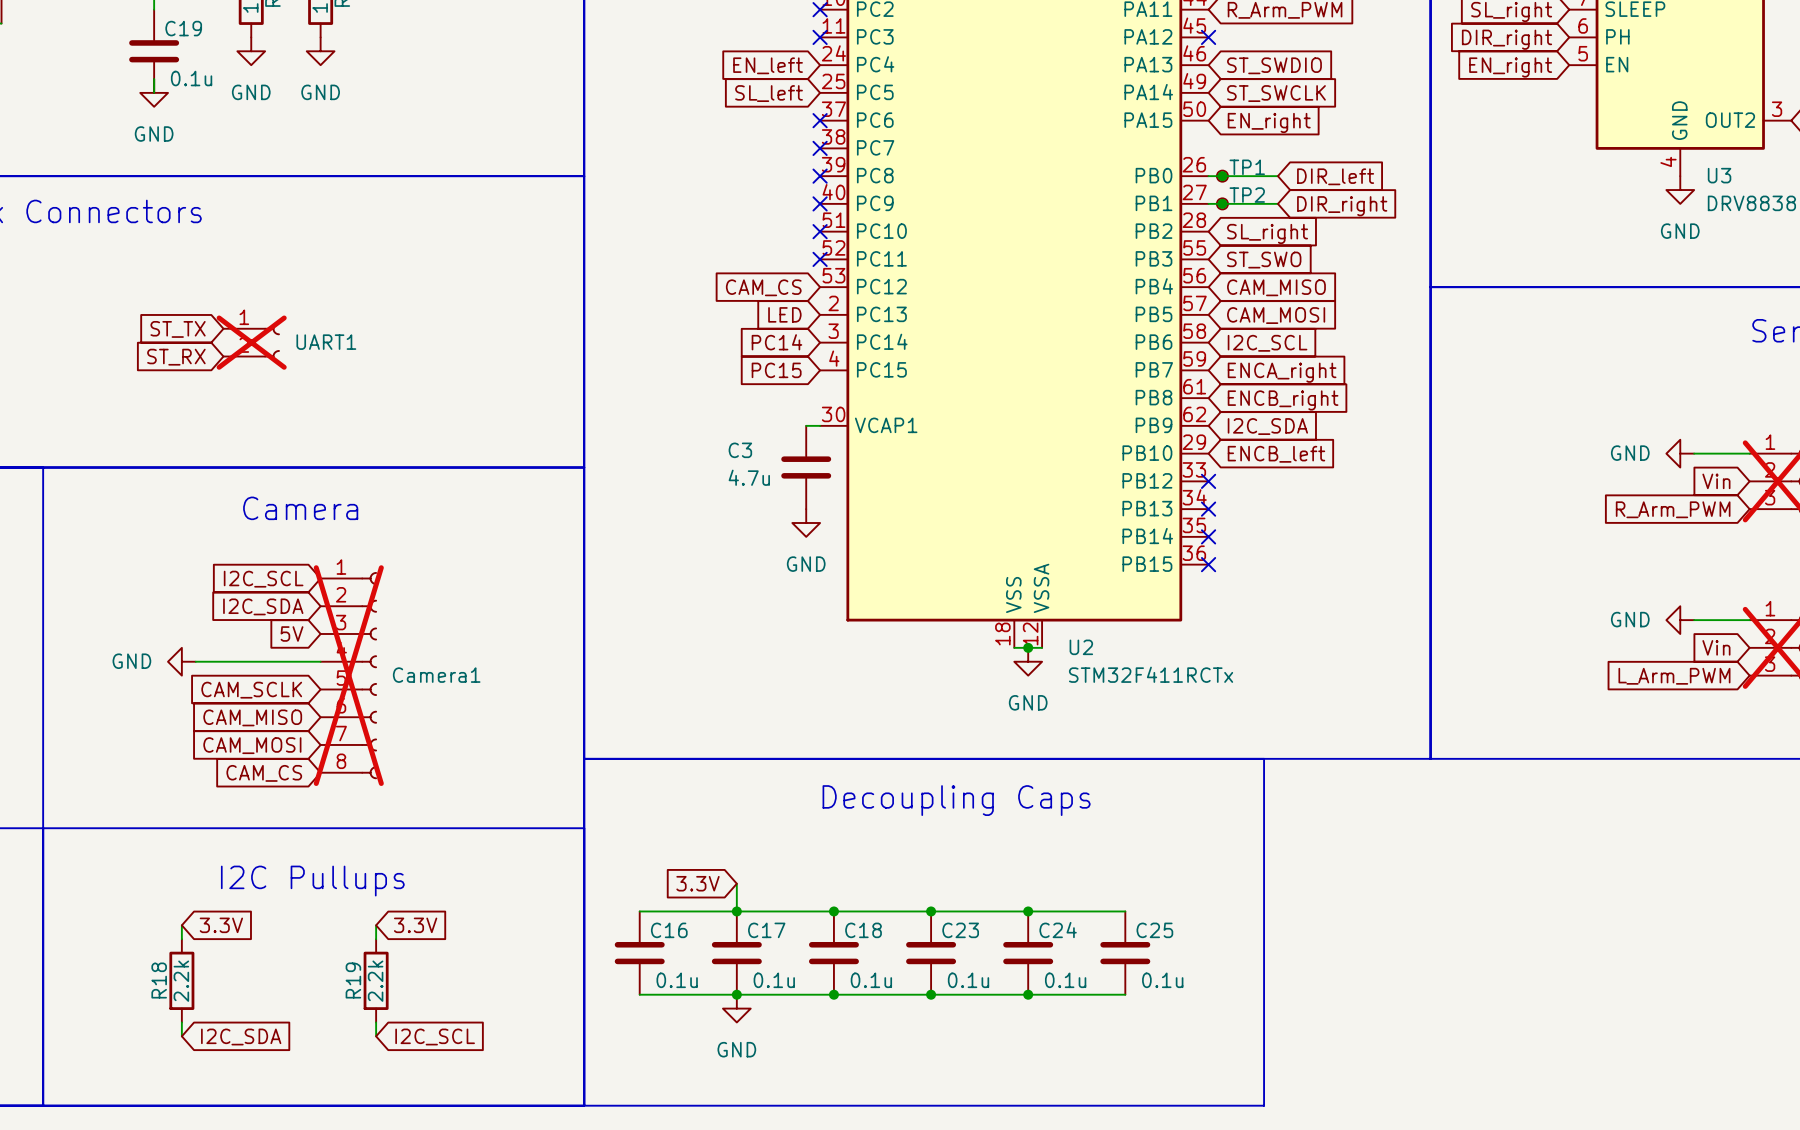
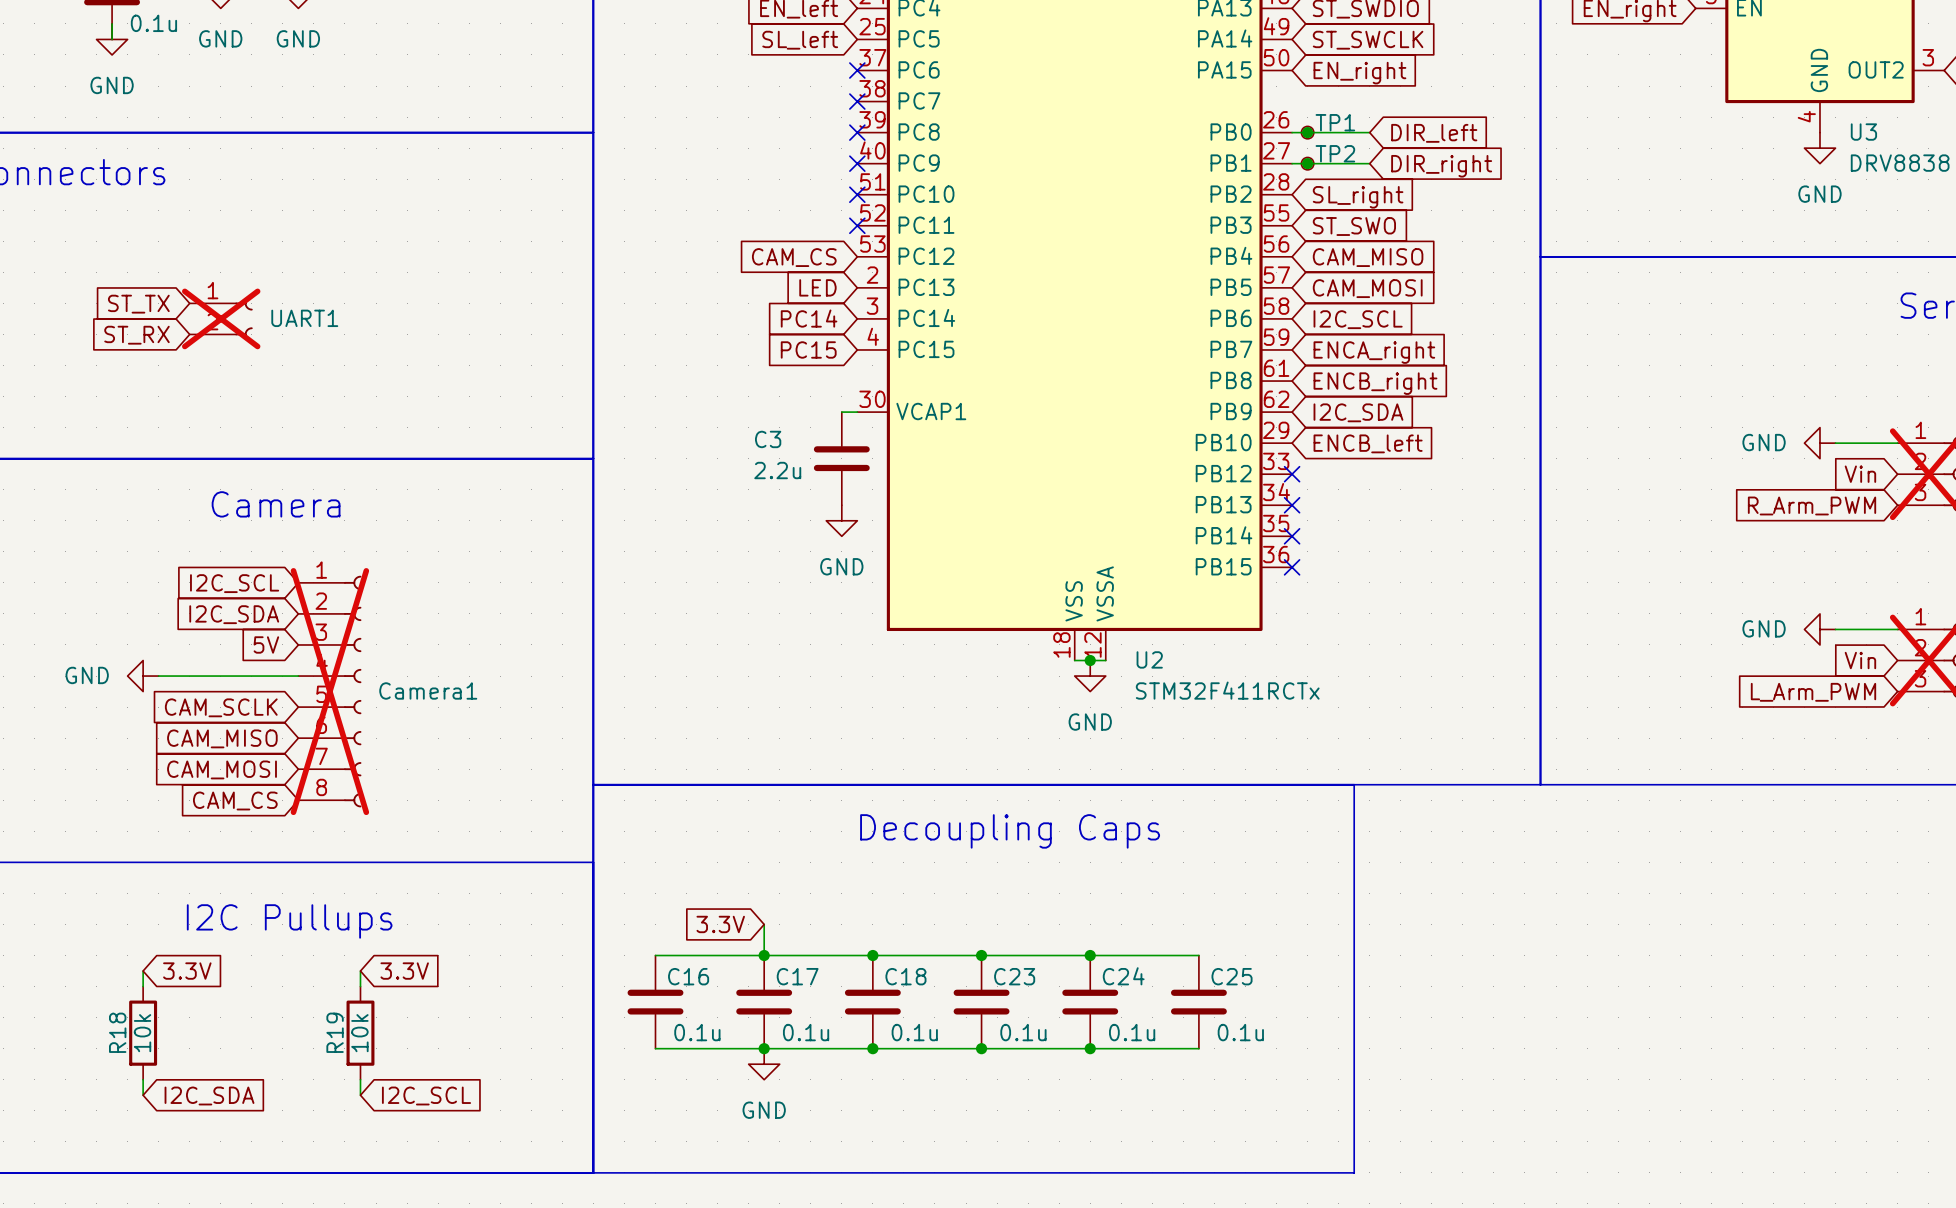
C3 value: 4.7u (749, 477) -> 2.2u (777, 470)
R18 value: 2.2k (181, 981) -> 10k (142, 1033)
R19 value: 2.2k (375, 981) -> 10k (359, 1033)

